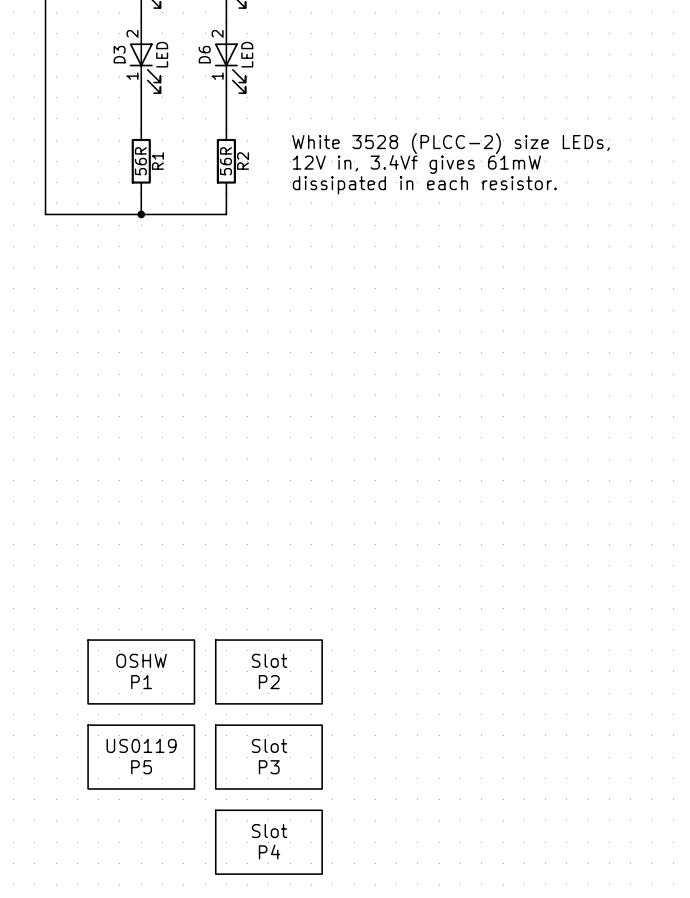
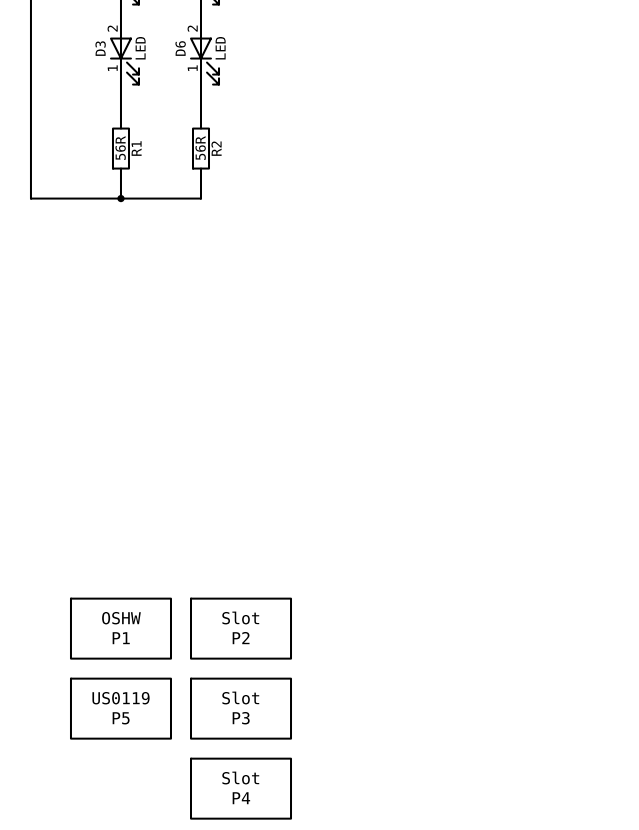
text: White 3528 (PLCC-2) size LEDs, (450, 143) -> none
text: 12V in, 3.4Vf gives 61mW (416, 164) -> none
text: dissipated in each resistor. (424, 185) -> none

